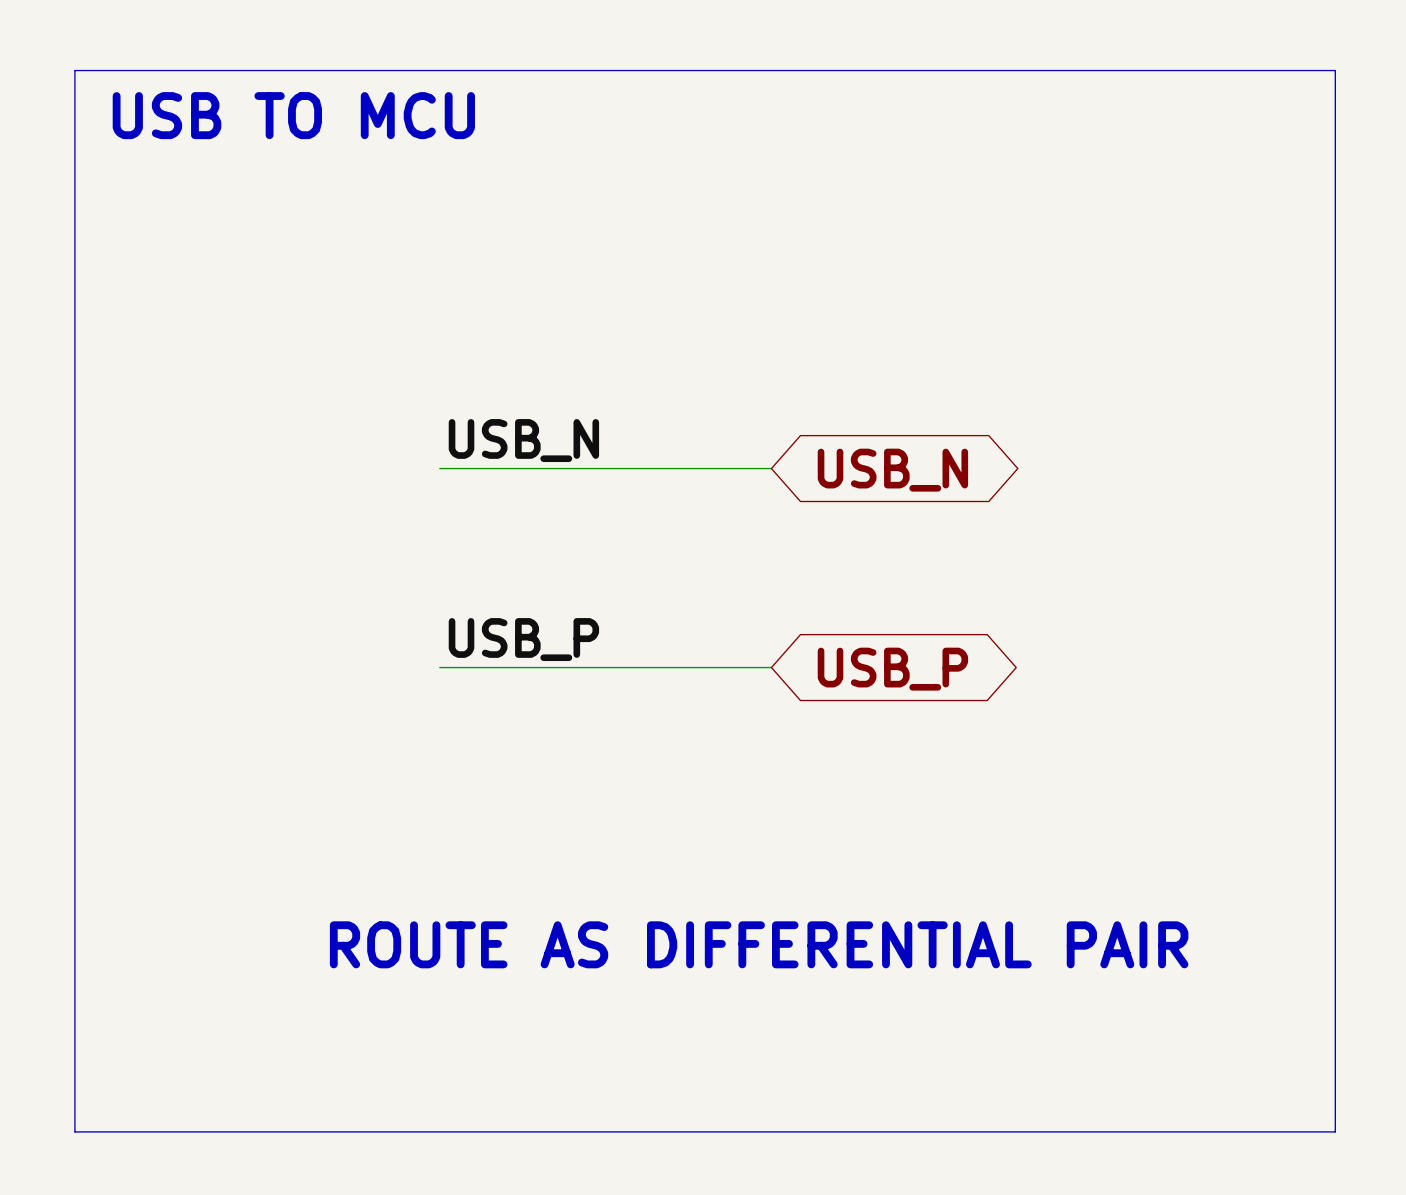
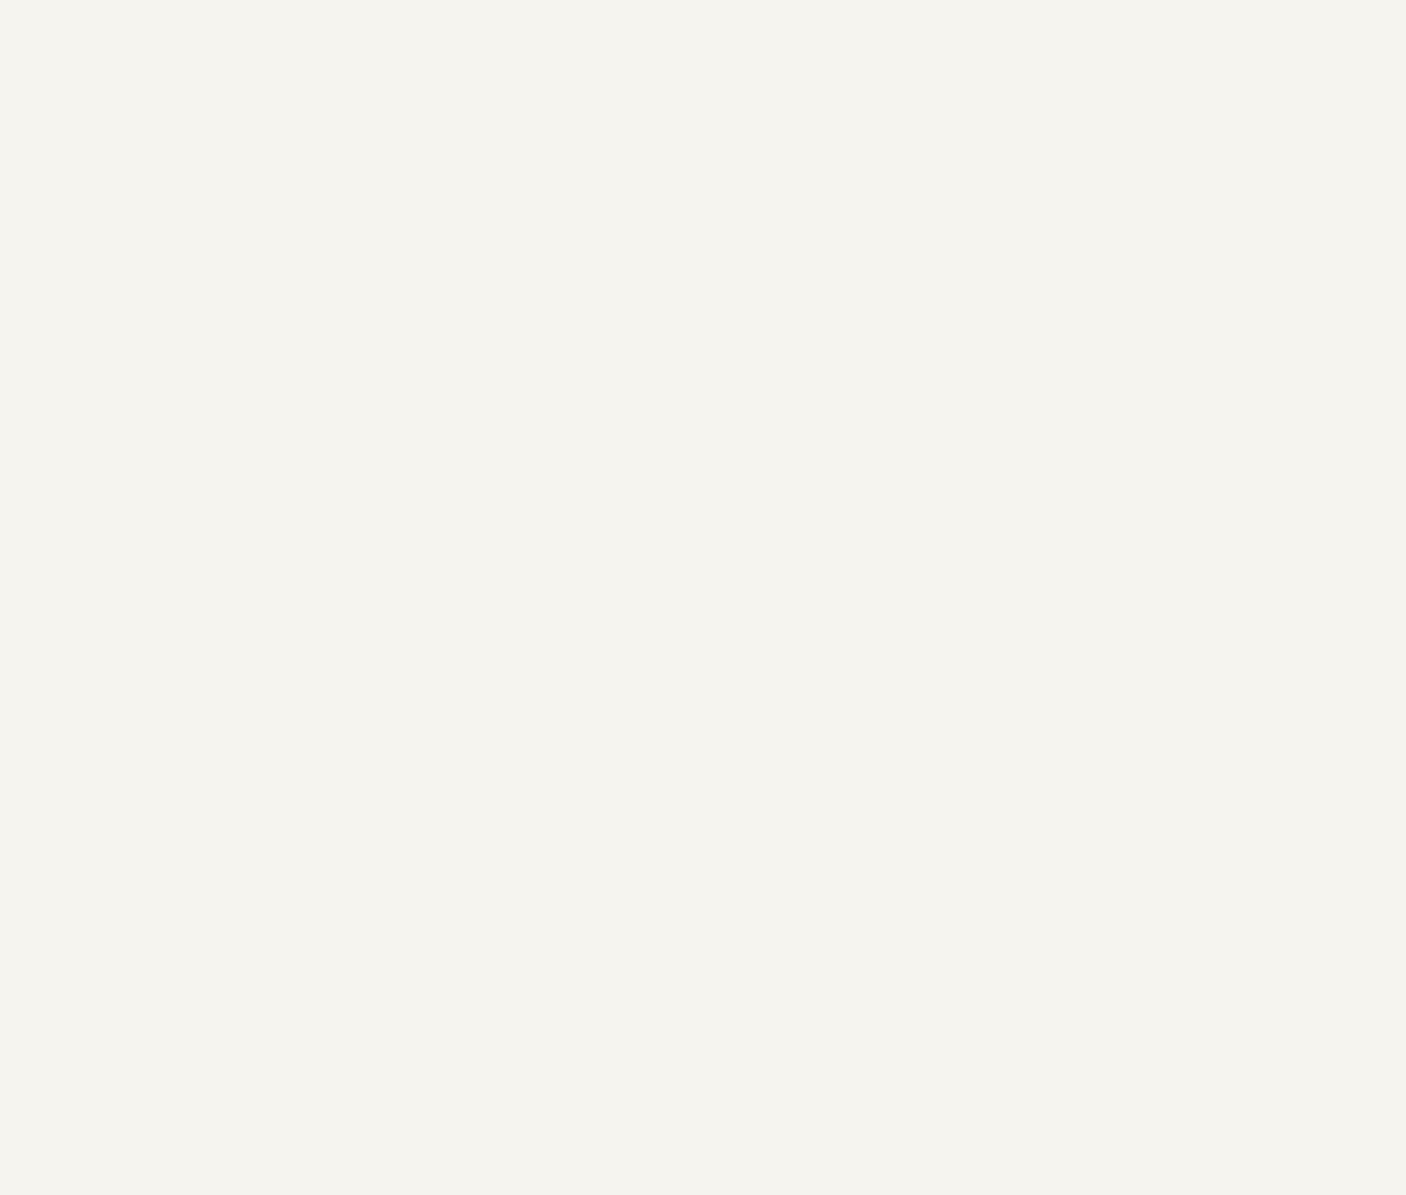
line: (74, 70) (1335, 70) (1335, 1131) (74, 1131) (74, 70) -> none
text: USB TO MCU (293, 115) -> none
label: USB_N (523, 440) -> none
wire: (439, 468) (771, 468) -> none
global label: USB_N (892, 470) -> none
label: USB_P (523, 639) -> none
wire: (439, 667) (771, 667) -> none
global label: USB_P (892, 669) -> none
text: ROUTE AS DIFFERENTIAL PAIR (759, 944) -> none

